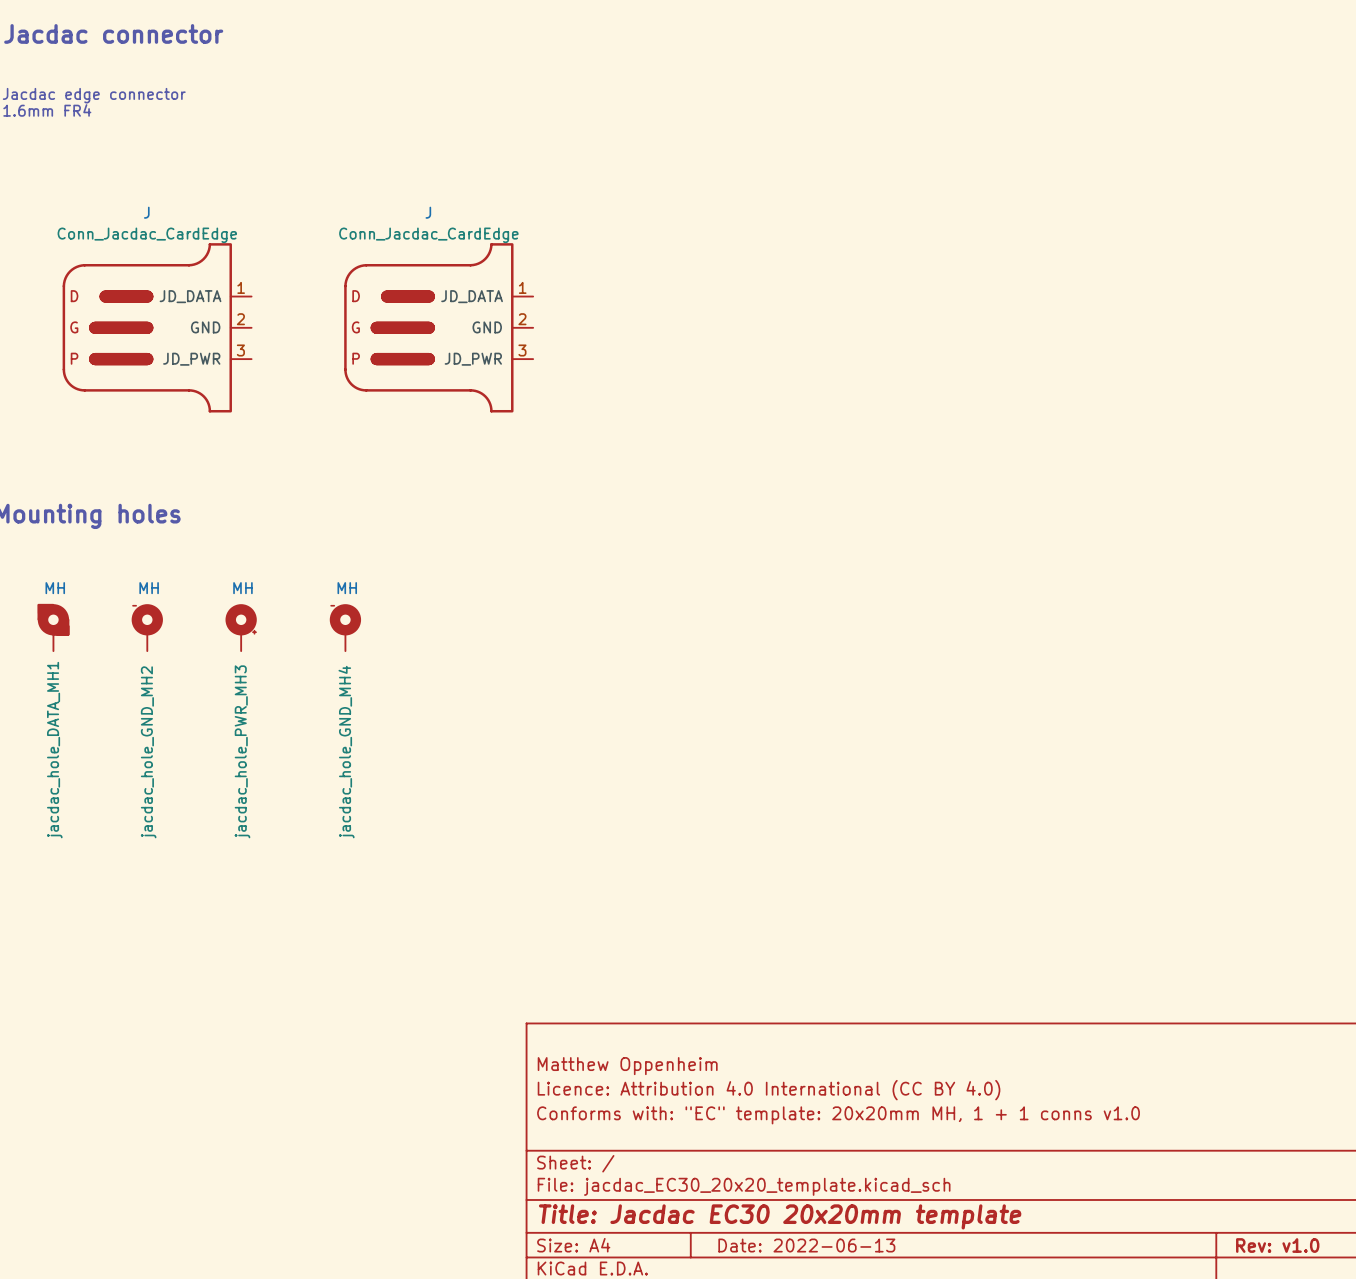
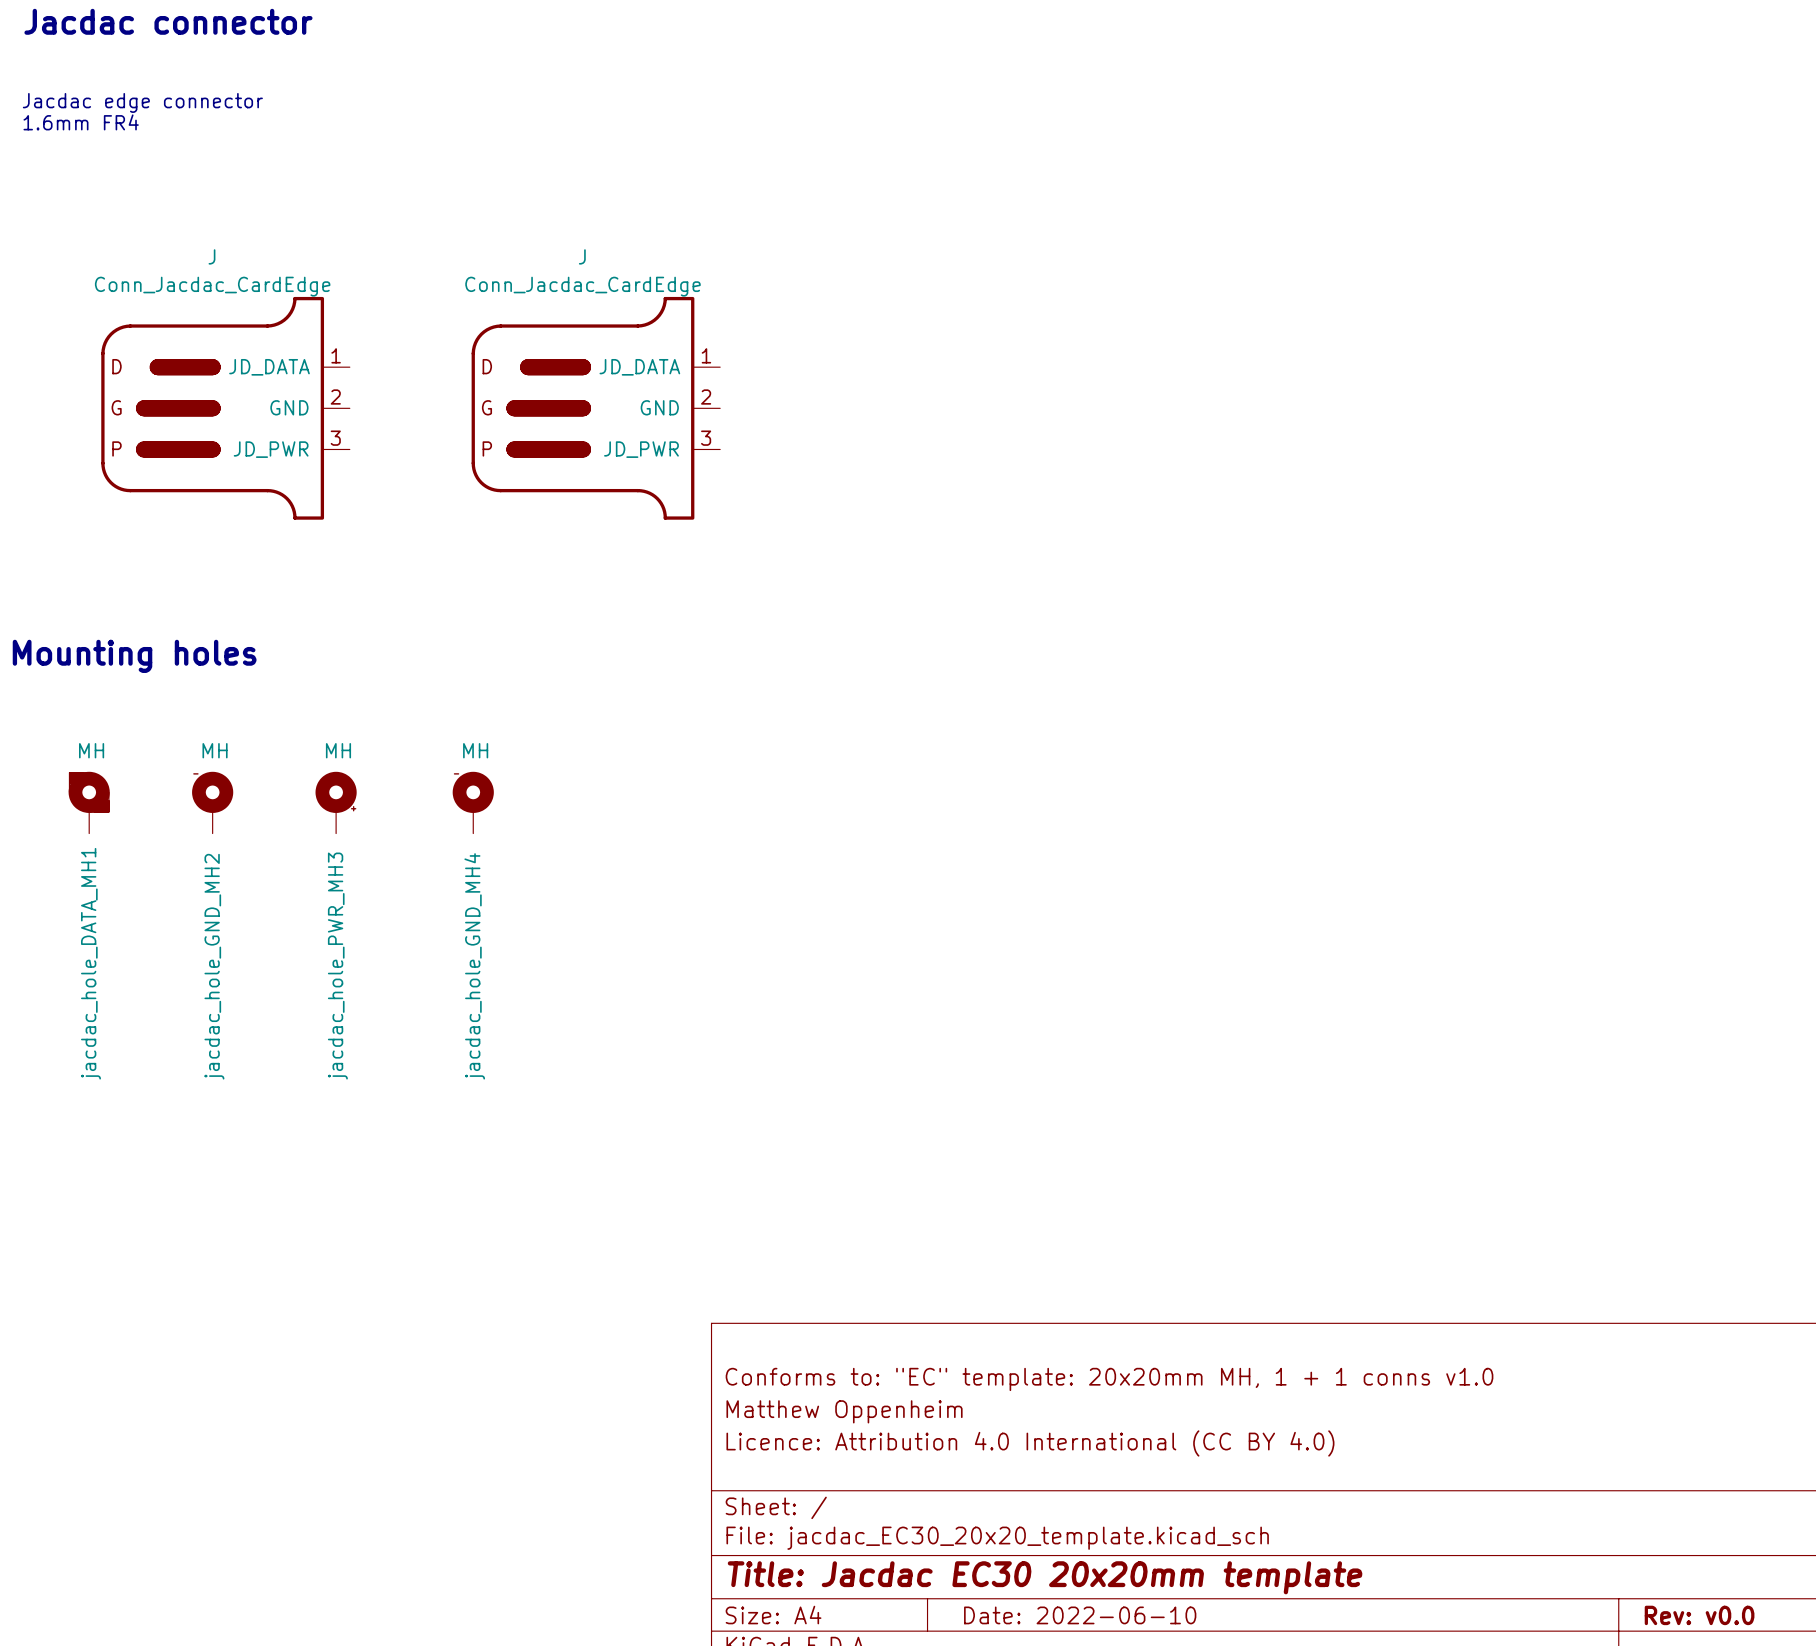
title block: Matthew Oppenheim (627, 1066) -> Conforms to: "EC" template: 20x20mm MH, 1 + 1 conns v1.0 (1109, 1379)
title block: Licence: Attribution 4.0 International (CC BY 4.0) (769, 1090) -> Matthew Oppenheim (844, 1411)
title block: Conforms with: "EC" template: 20x20mm MH, 1 + 1 conns v1.0 (838, 1115) -> Licence: Attribution 4.0 International (CC BY 4.0) (1030, 1443)
title block: Date: 2022-06-13 (806, 1245) -> Date: 2022-06-10 (1080, 1615)
title block: Rev: v1.0 (1277, 1245) -> Rev: v0.0 (1699, 1615)

